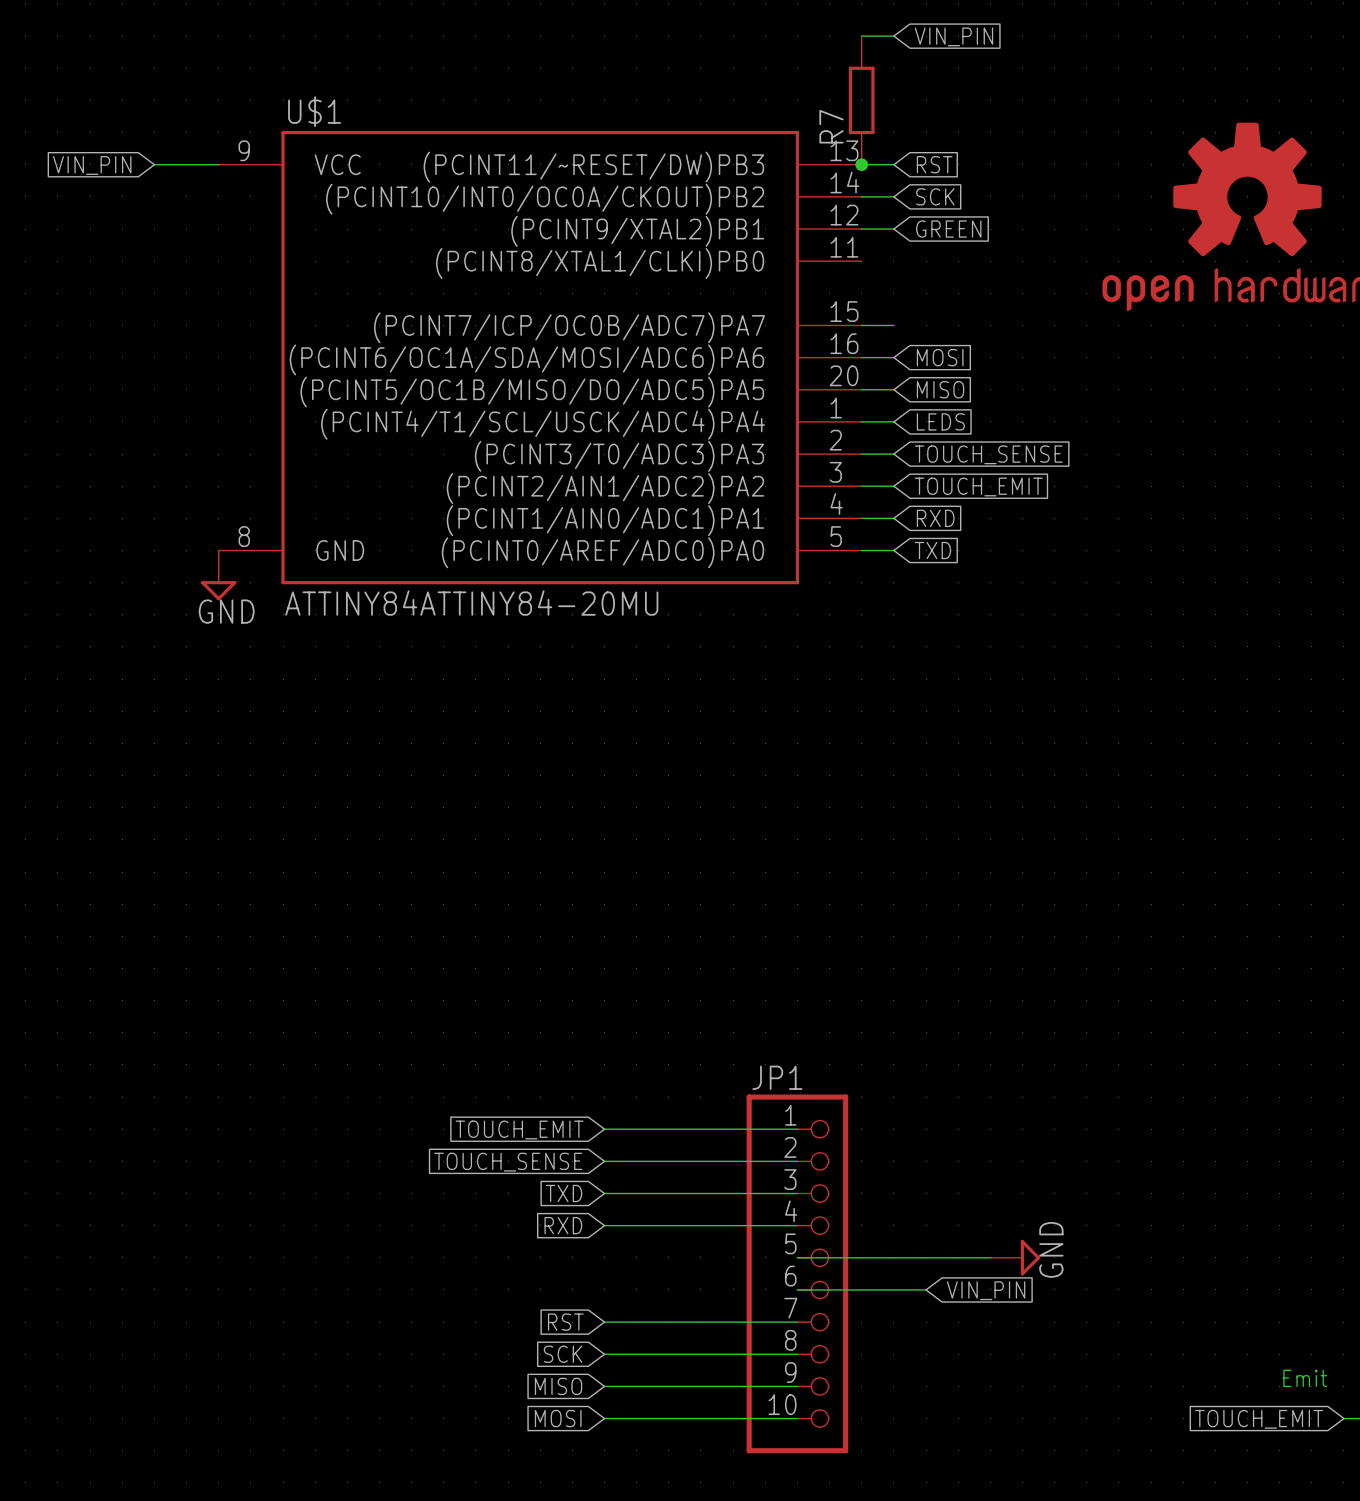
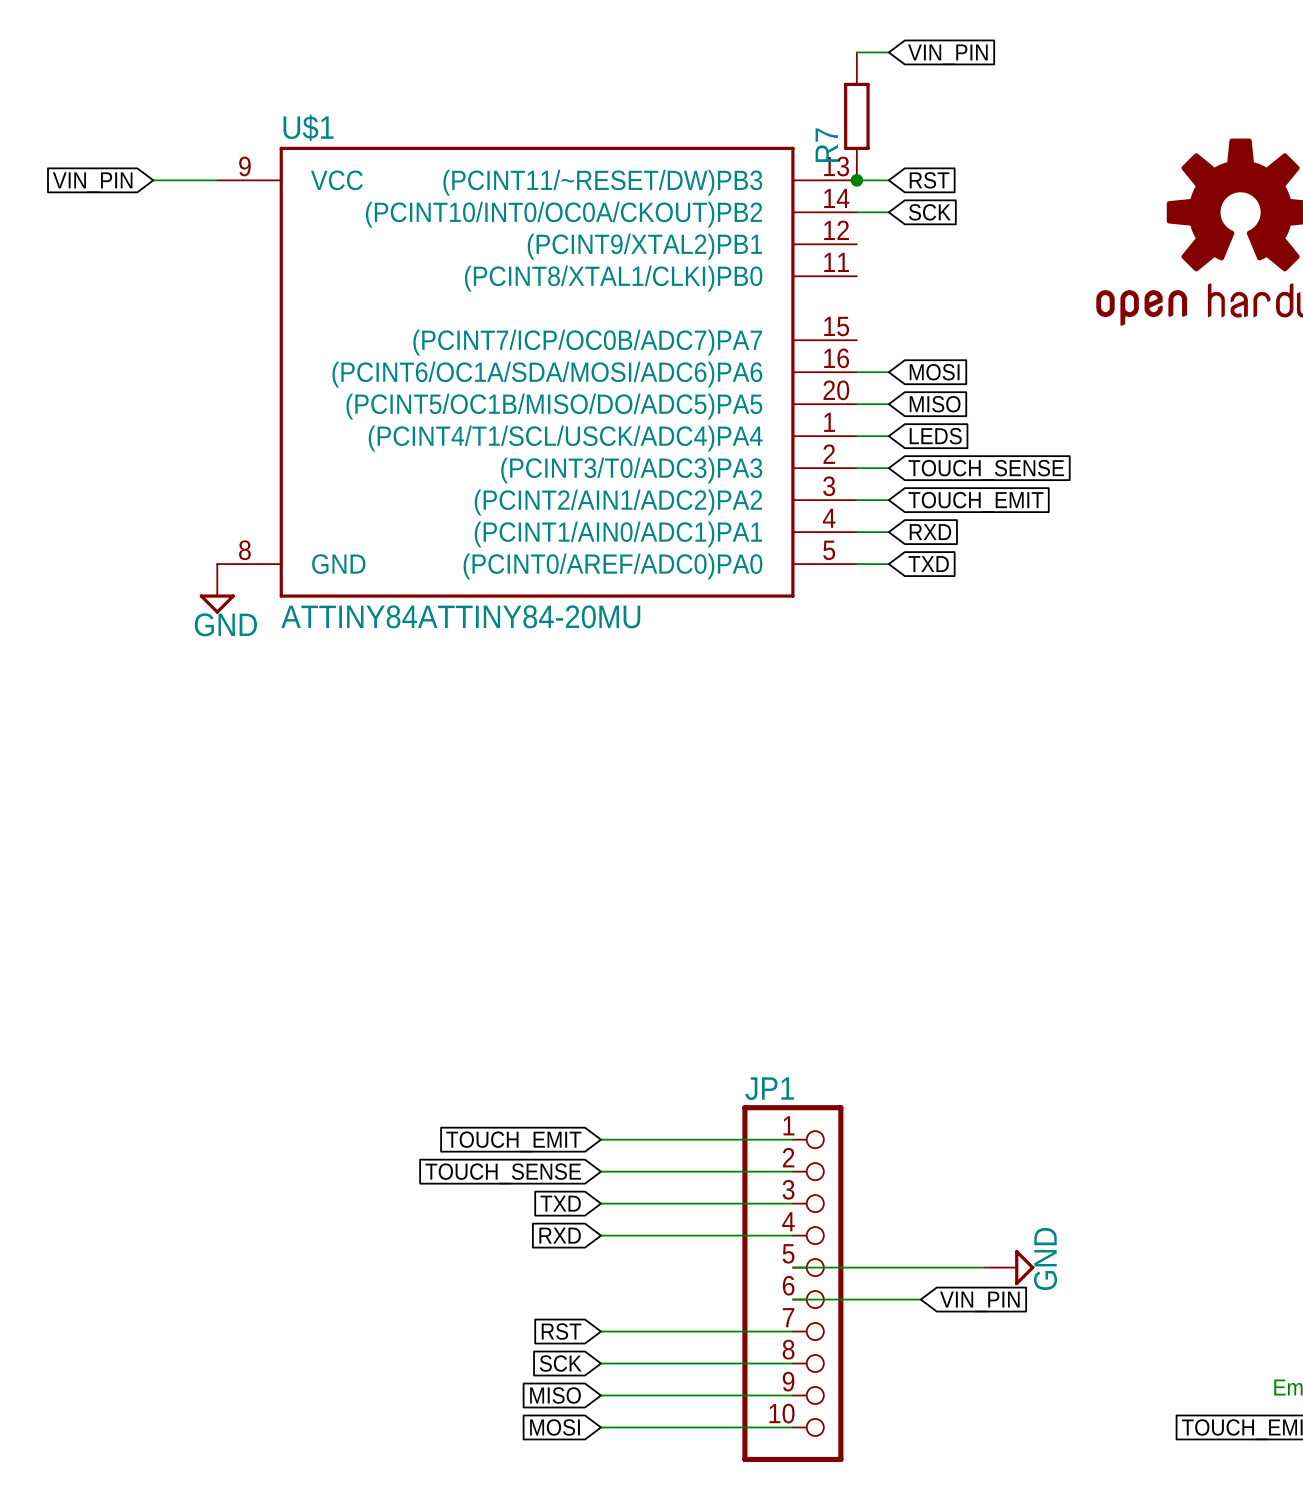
wire: (861, 229) (893, 229) -> none
global label: GREEN (948, 229) -> none
wire: (861, 325) (893, 325) -> none

